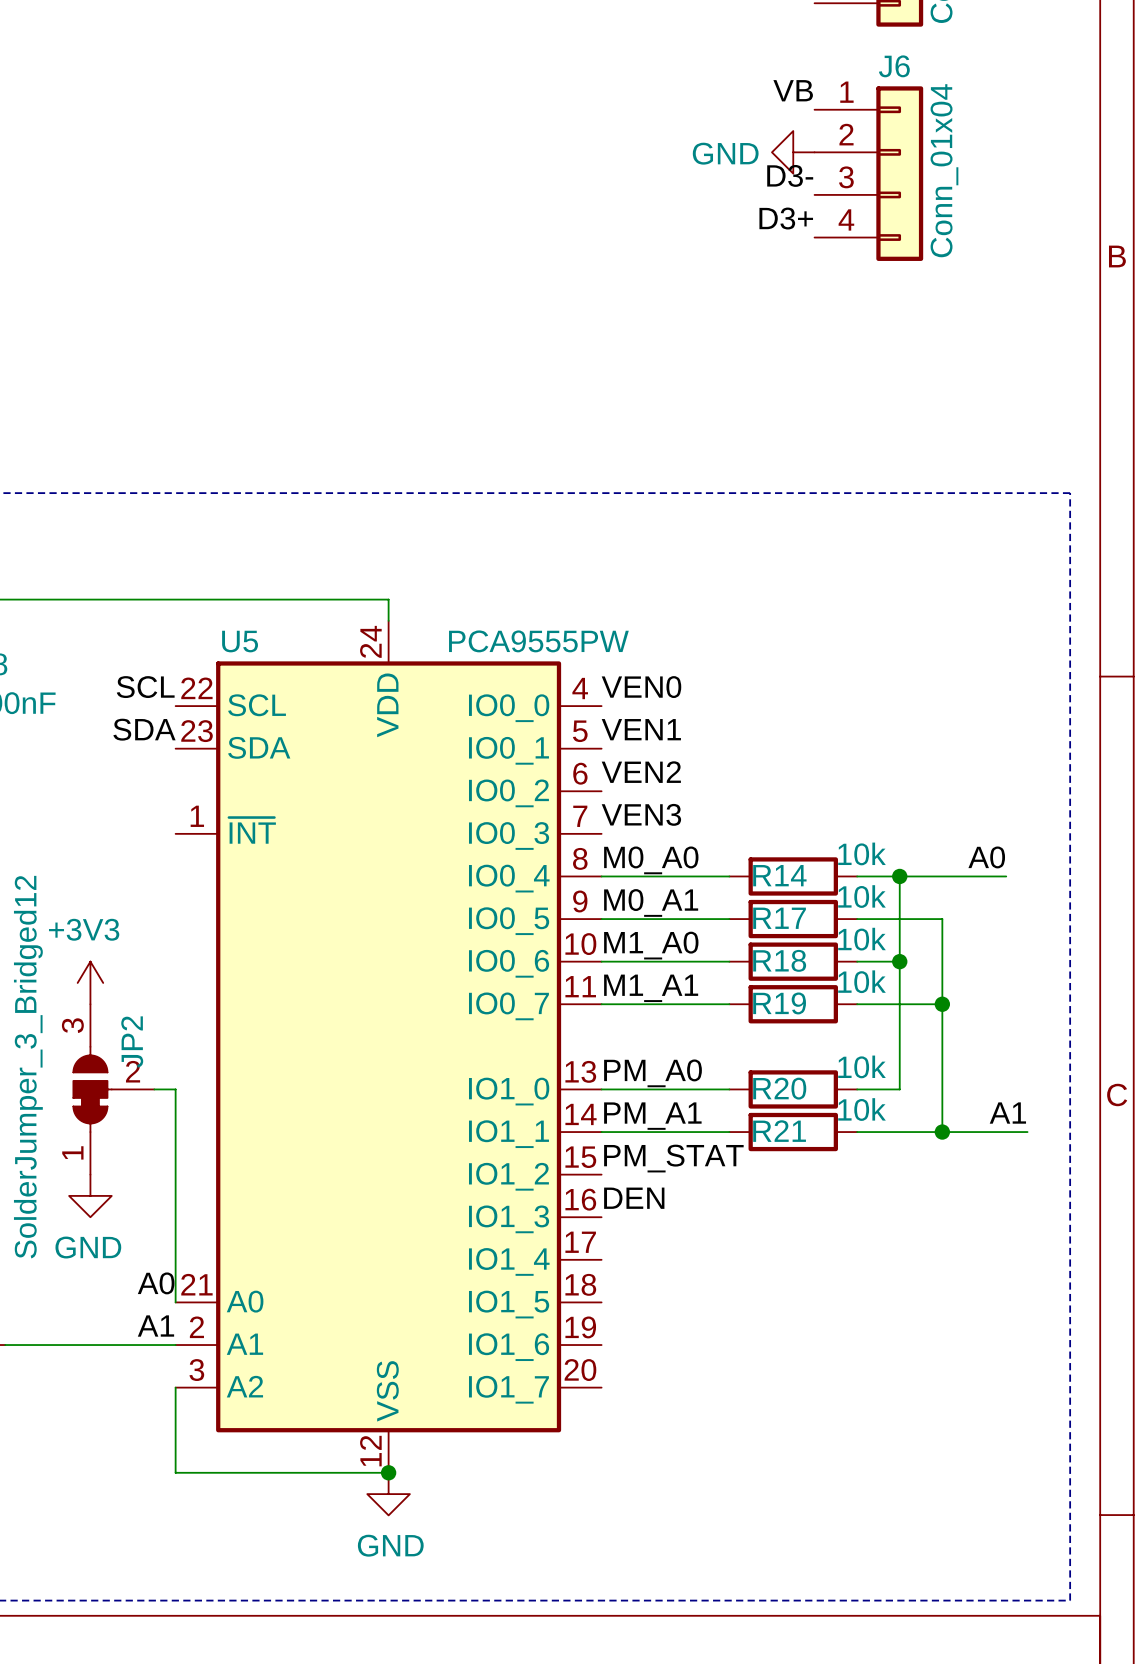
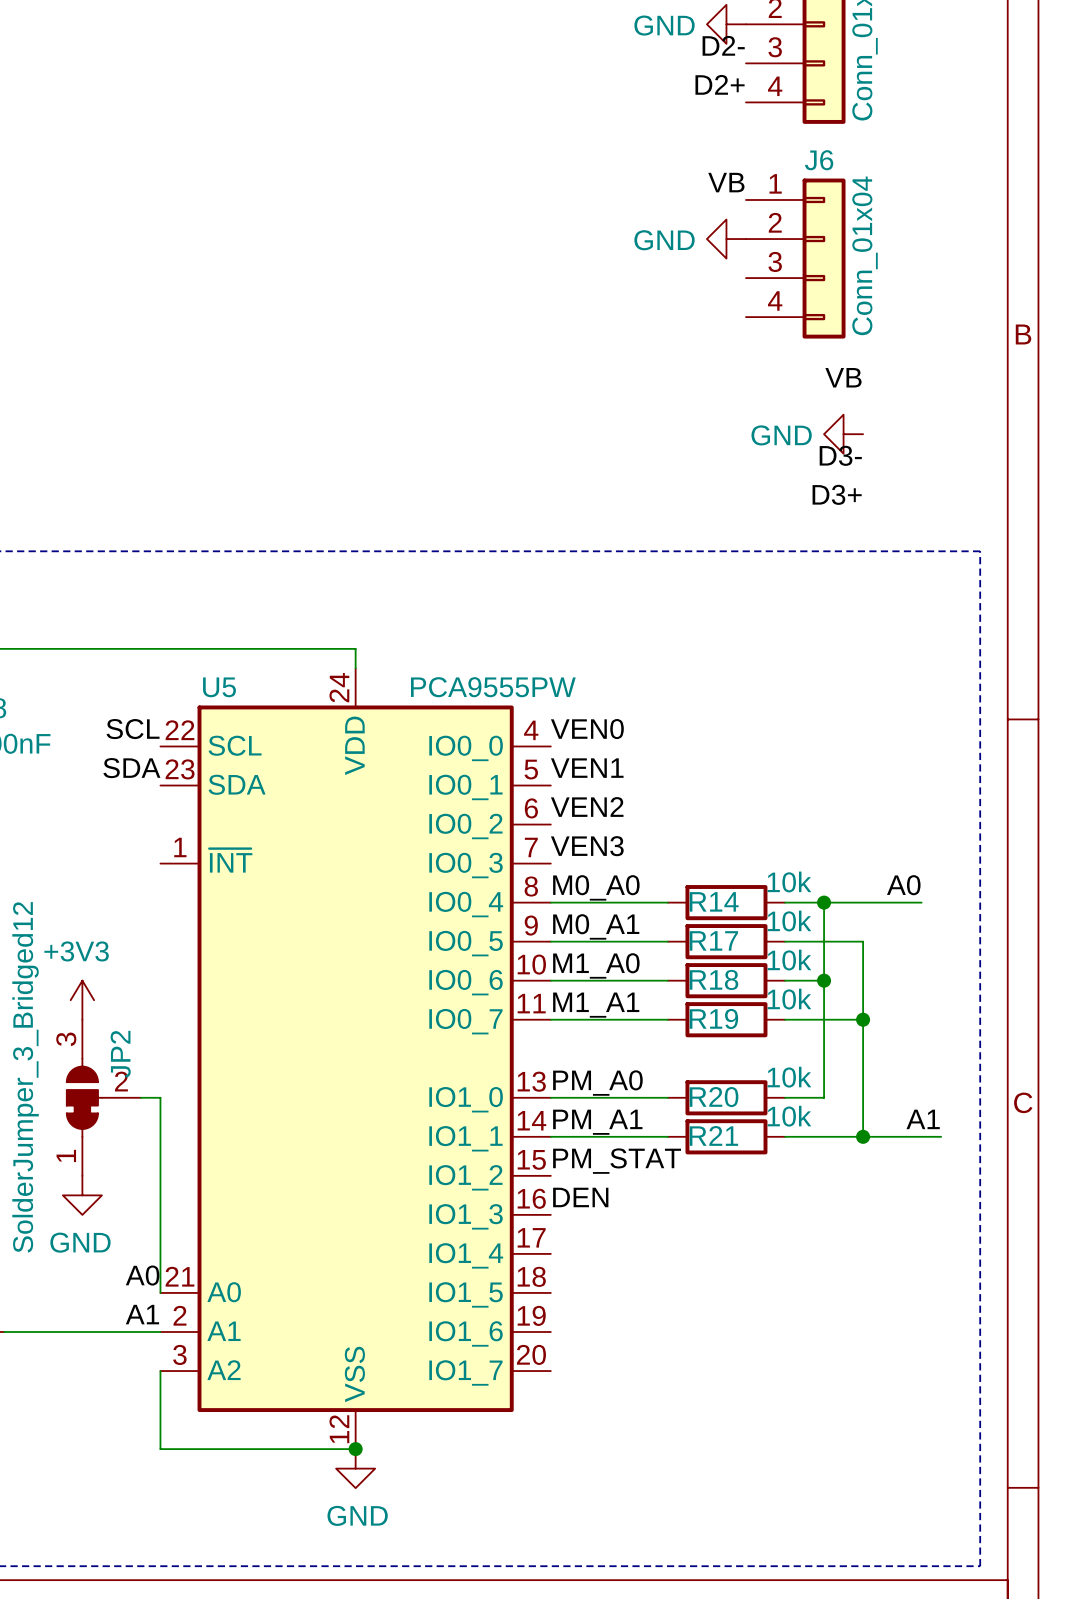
label position: D3- (790, 175) -> D3- (840, 455)
label position: D3+ (786, 218) -> D3+ (837, 494)
label: none -> VB (843, 377)
power symbol: none -> GND (843, 434)

